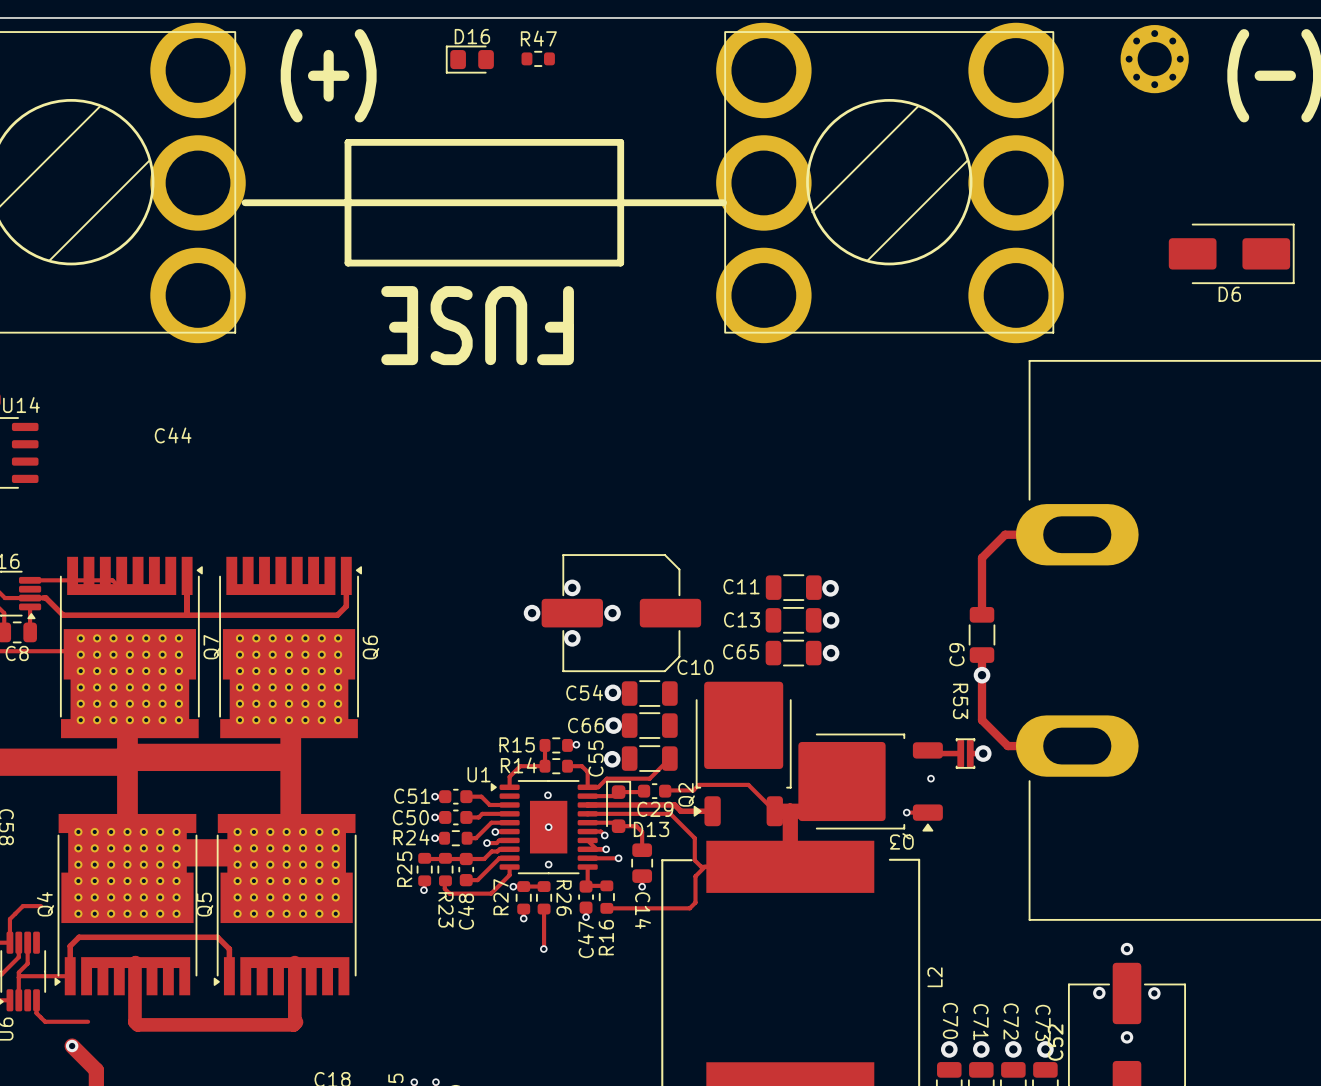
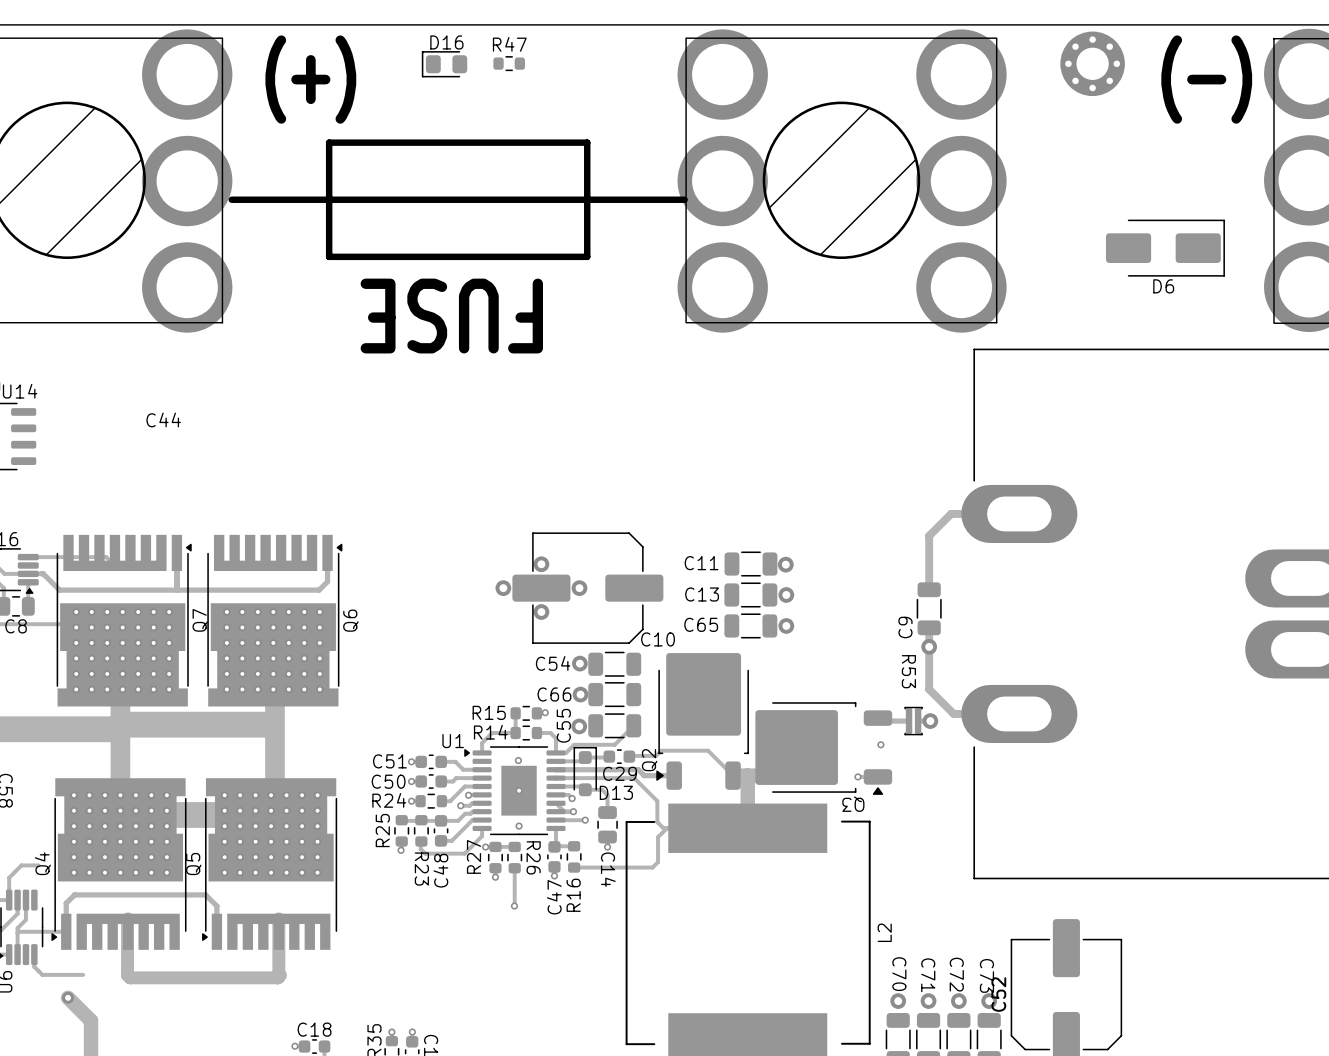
via: (1127, 949) -> none
via: (1099, 993) -> none
via: (1154, 993) -> none
via: (1127, 1037) -> none

